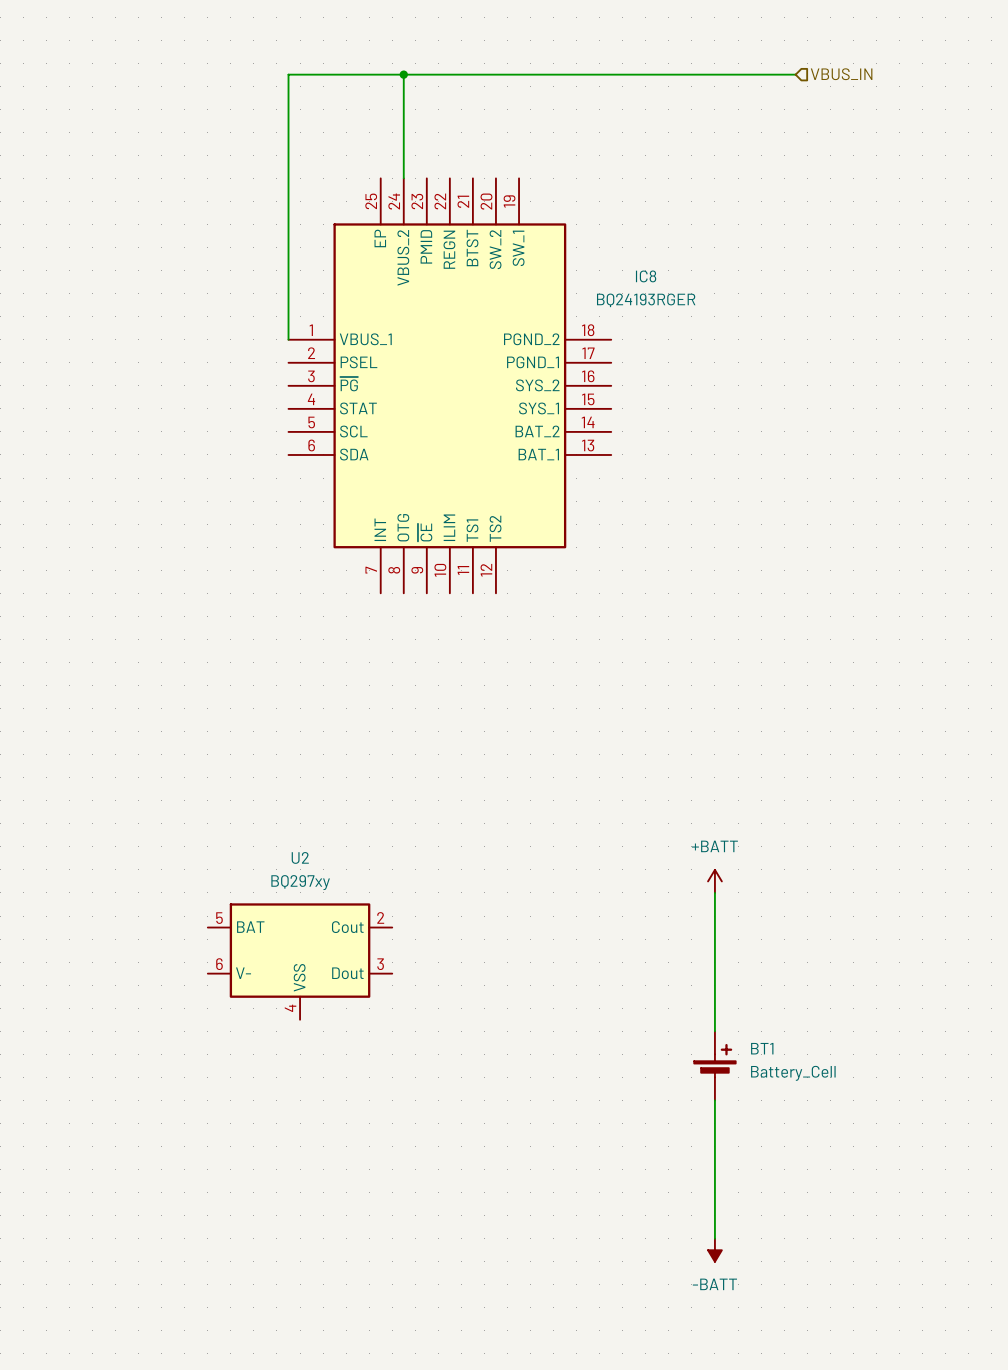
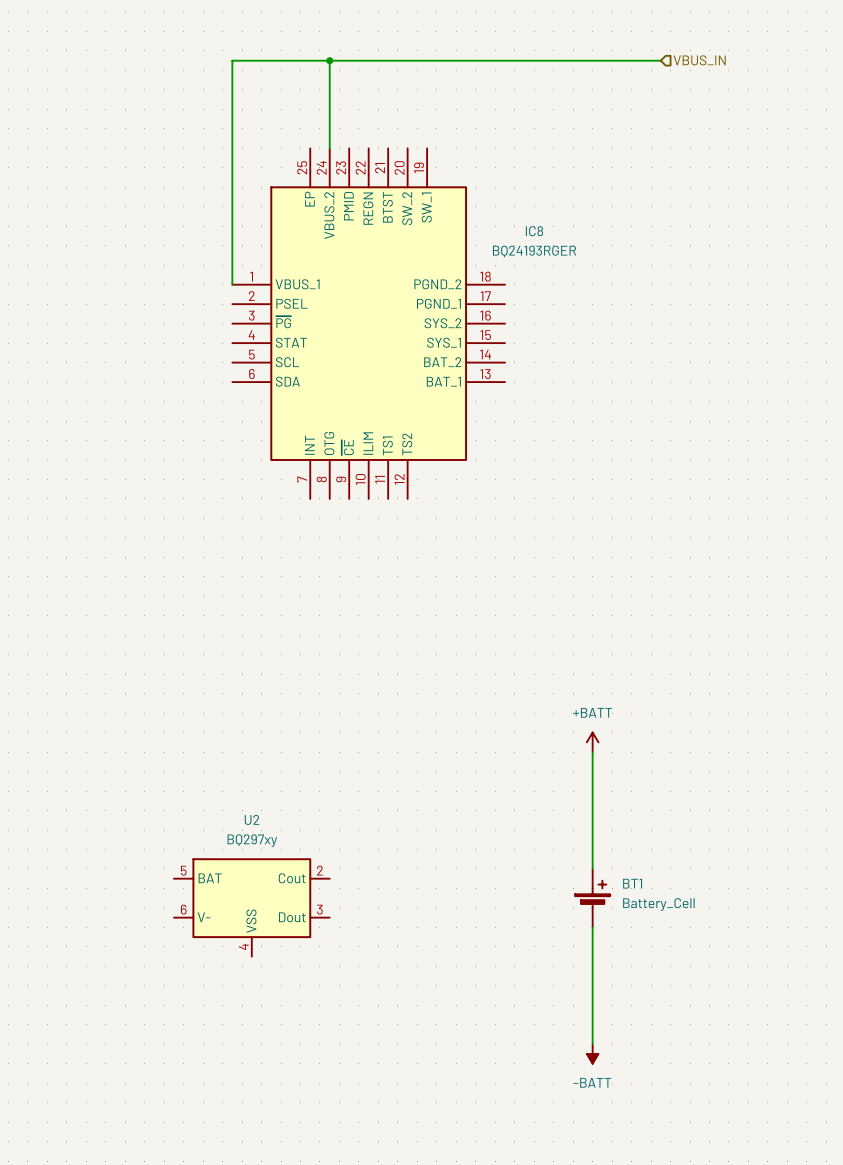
U2 position: (300, 961) -> (251, 907)

